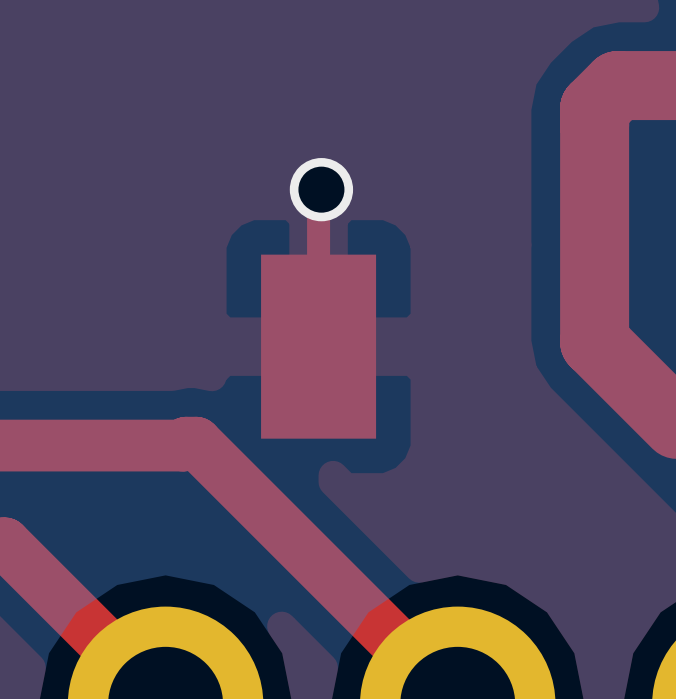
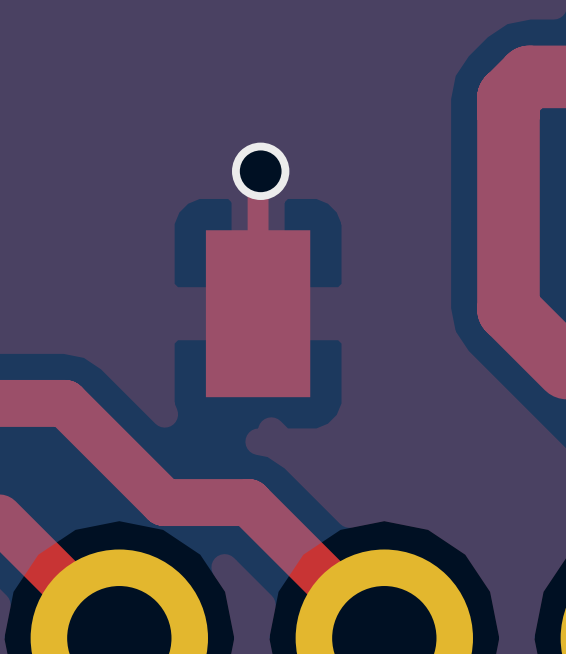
top track: (105, 445) (183, 445) (186, 442) (196, 442) (308, 554) -> (65, 403) (164, 502) (248, 502)

